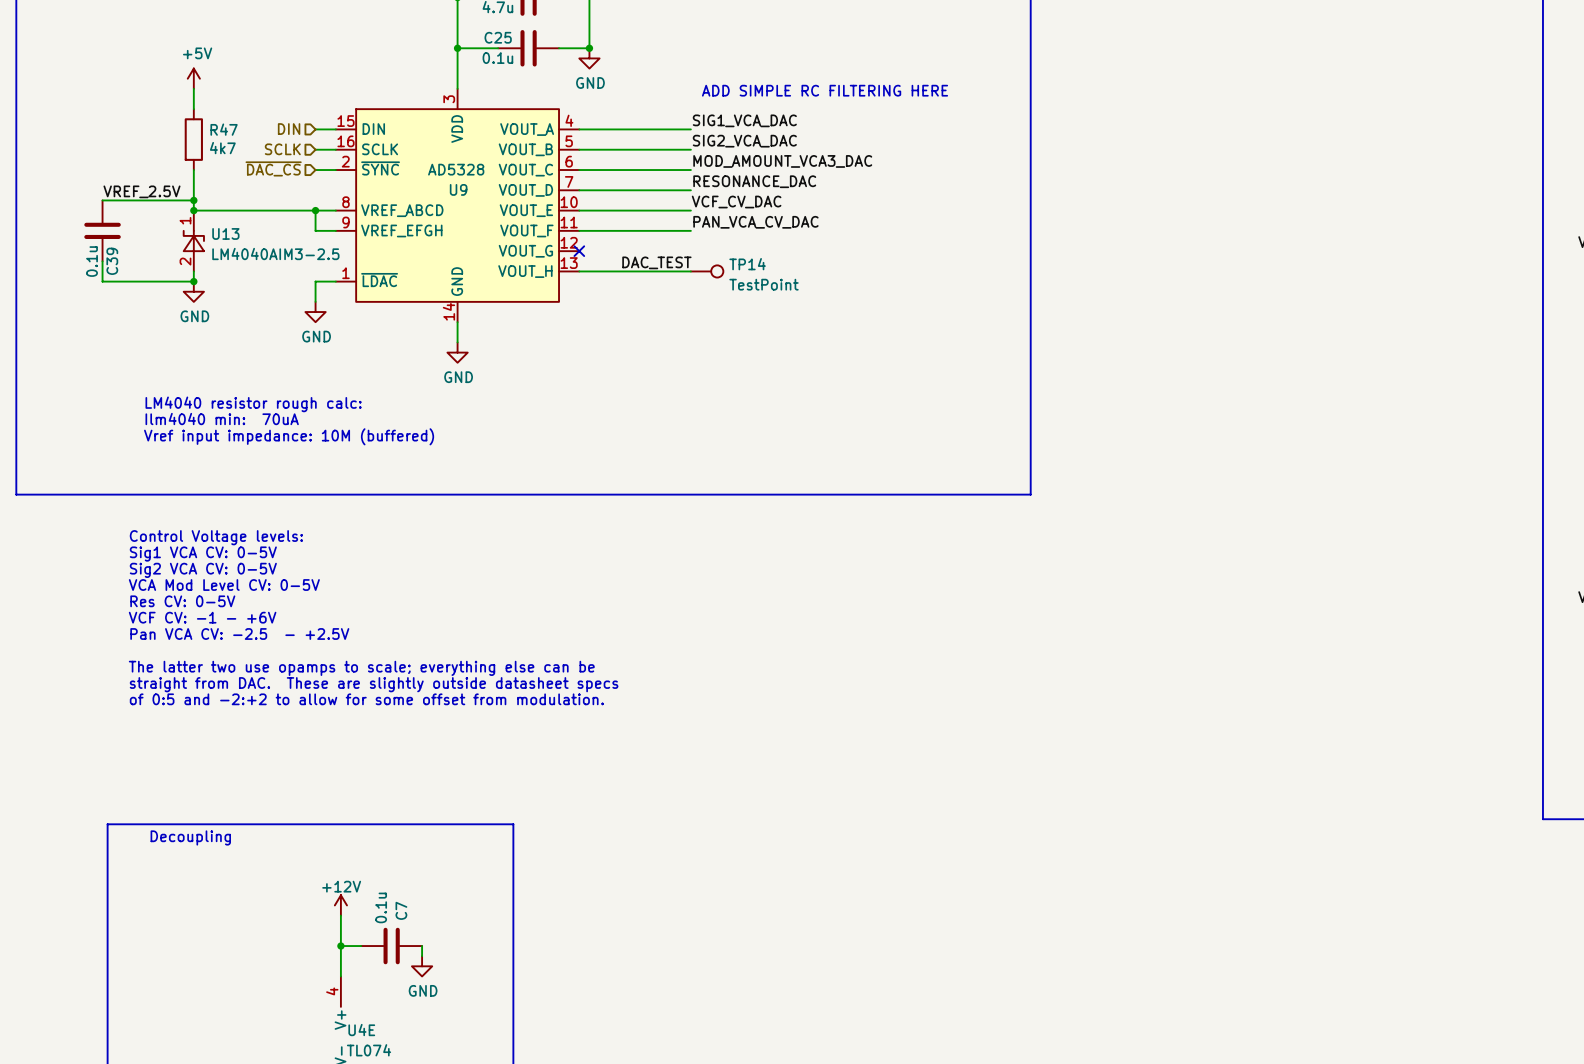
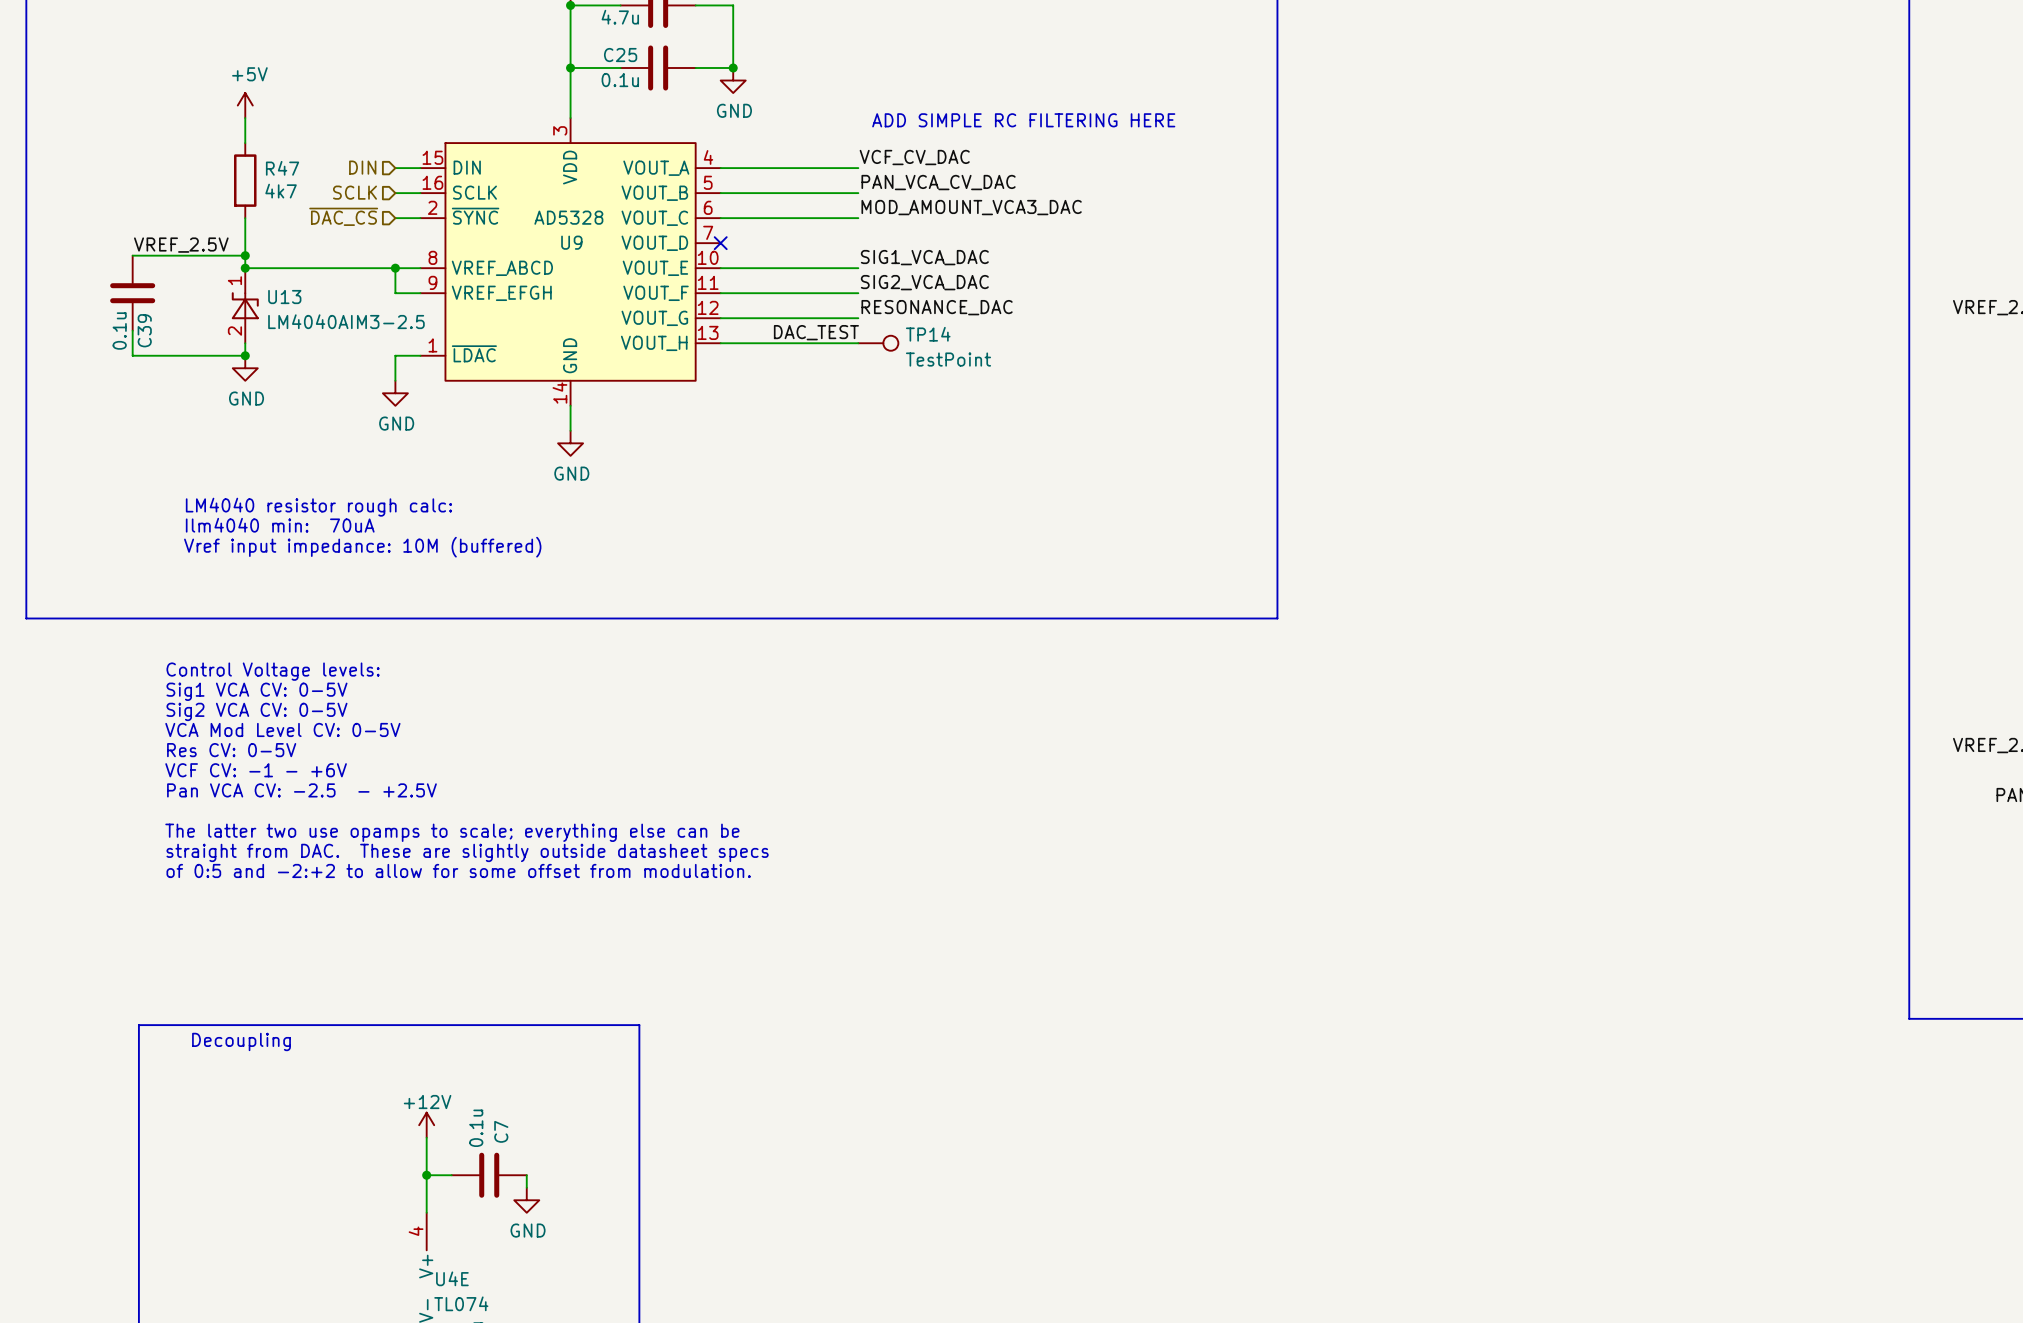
label: SIG1_VCA_DAC (744, 120) -> VCF_CV_DAC (914, 157)
label: SIG2_VCA_DAC (744, 141) -> PAN_VCA_CV_DAC (938, 182)
label position: RESONANCE_DAC (754, 181) -> RESONANCE_DAC (937, 307)
wire: (579, 190) (690, 190) -> (720, 318) (858, 318)
no-connect mark: none -> (720, 243)
label: VCF_CV_DAC (736, 202) -> SIG1_VCA_DAC (924, 257)
label: PAN_VCA_CV_DAC (755, 222) -> SIG2_VCA_DAC (924, 282)
no-connect mark: (579, 251) -> none

